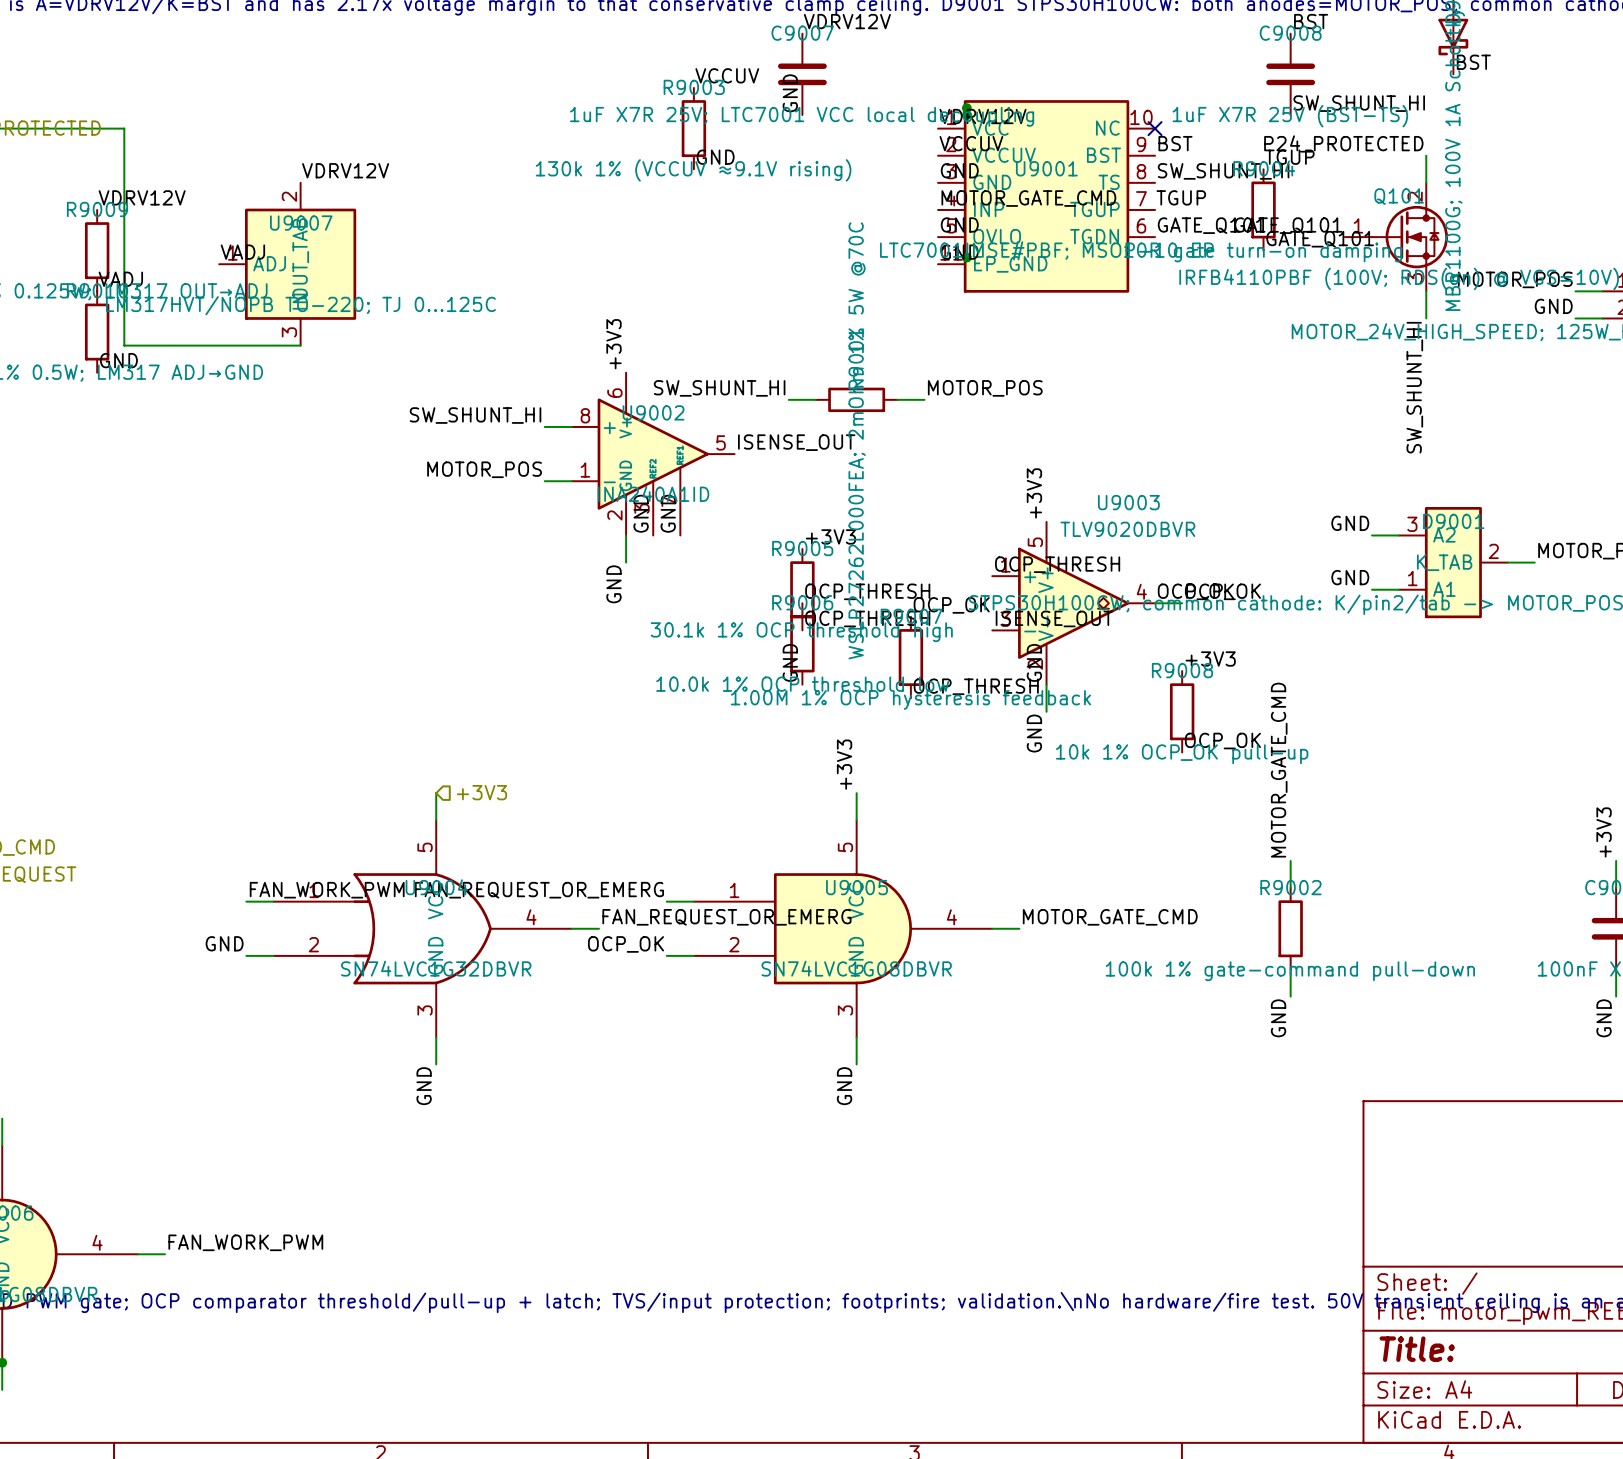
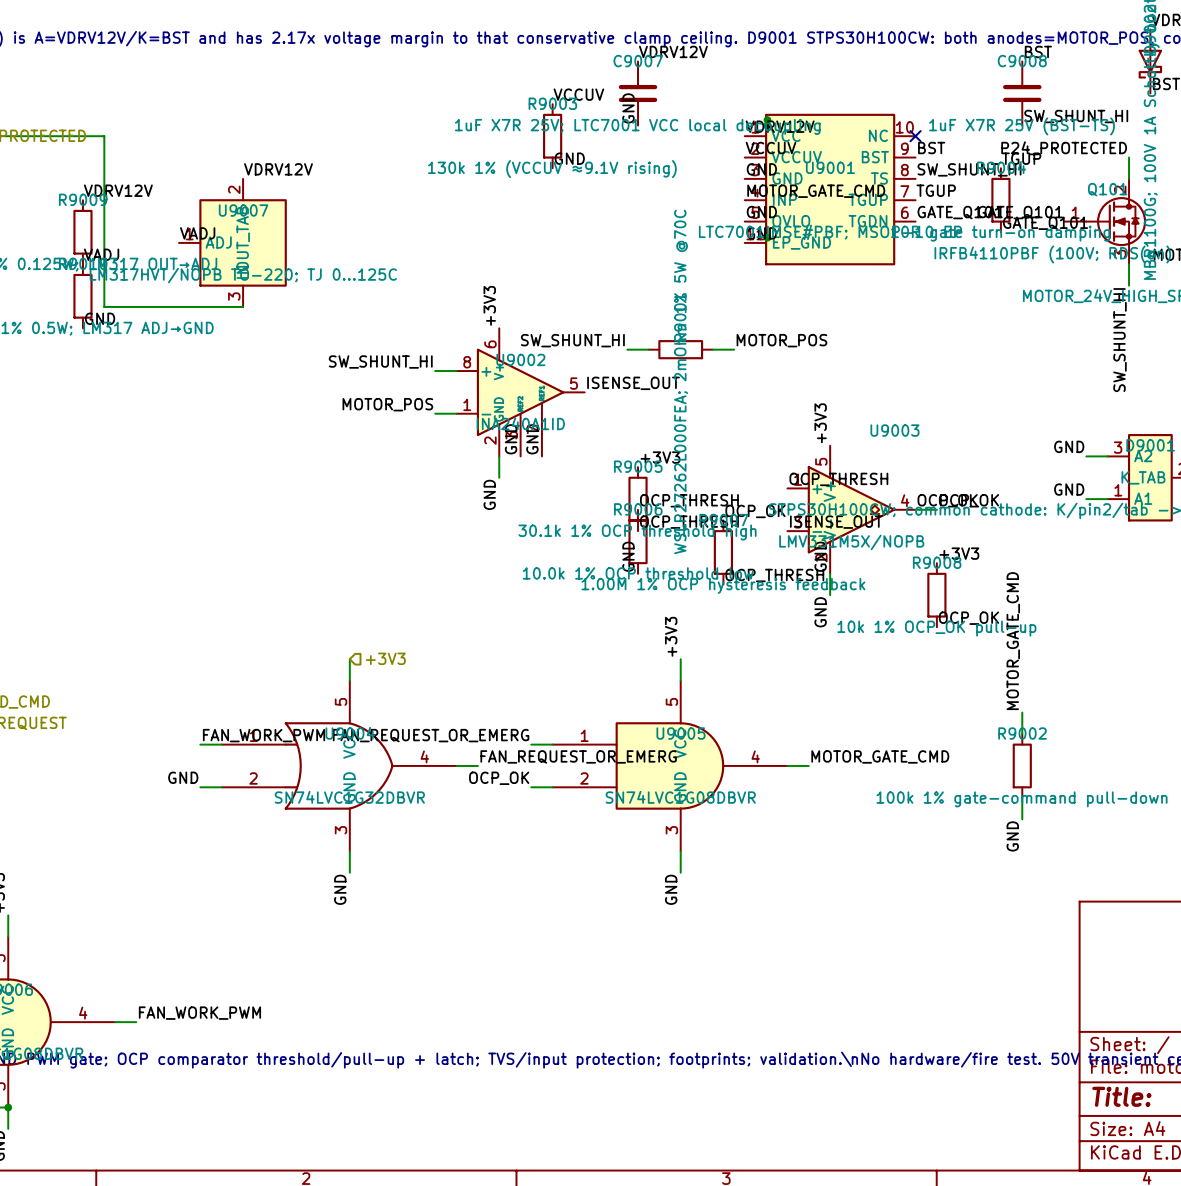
U9003 value: TLV9020DBVR (1127, 529) -> LMV331M5X/NOPB (851, 542)

